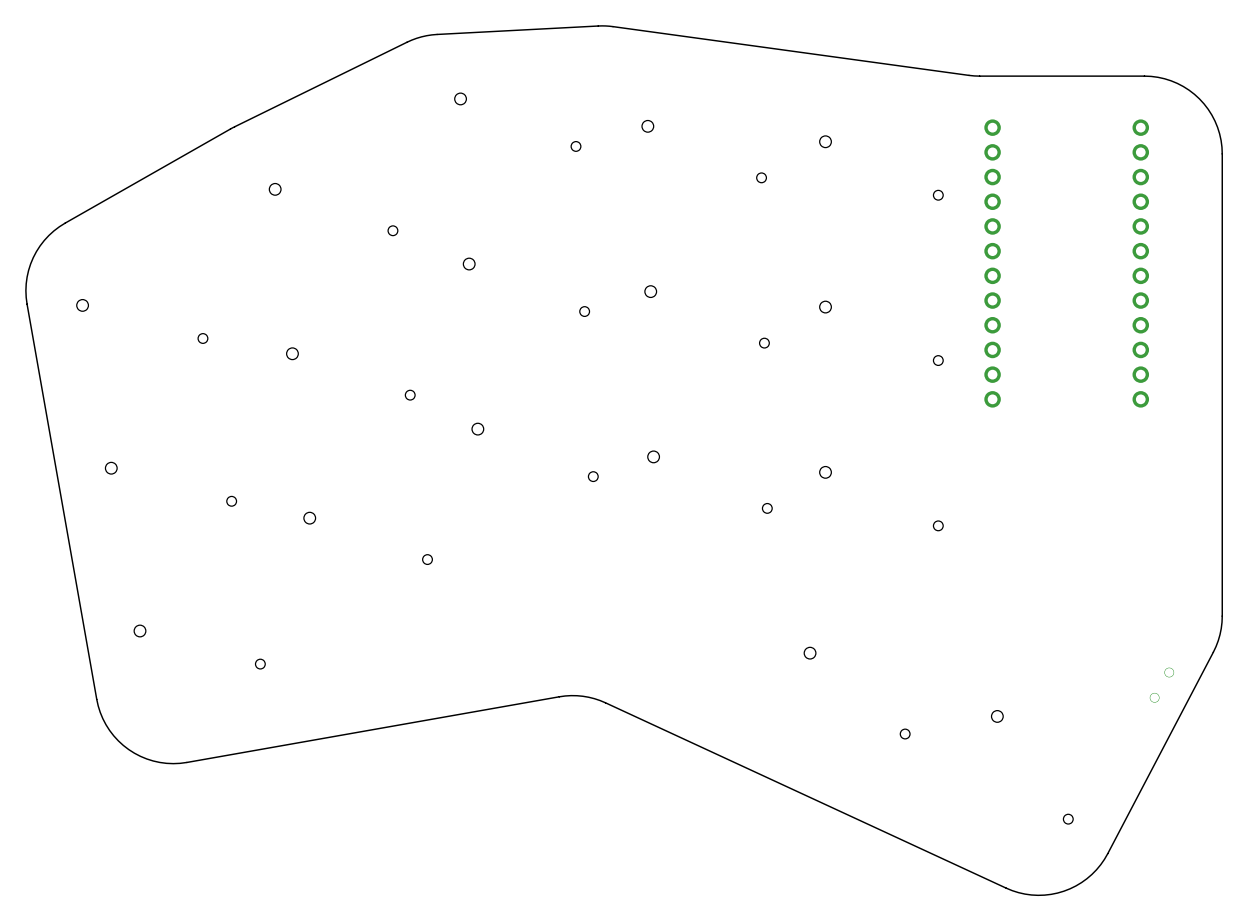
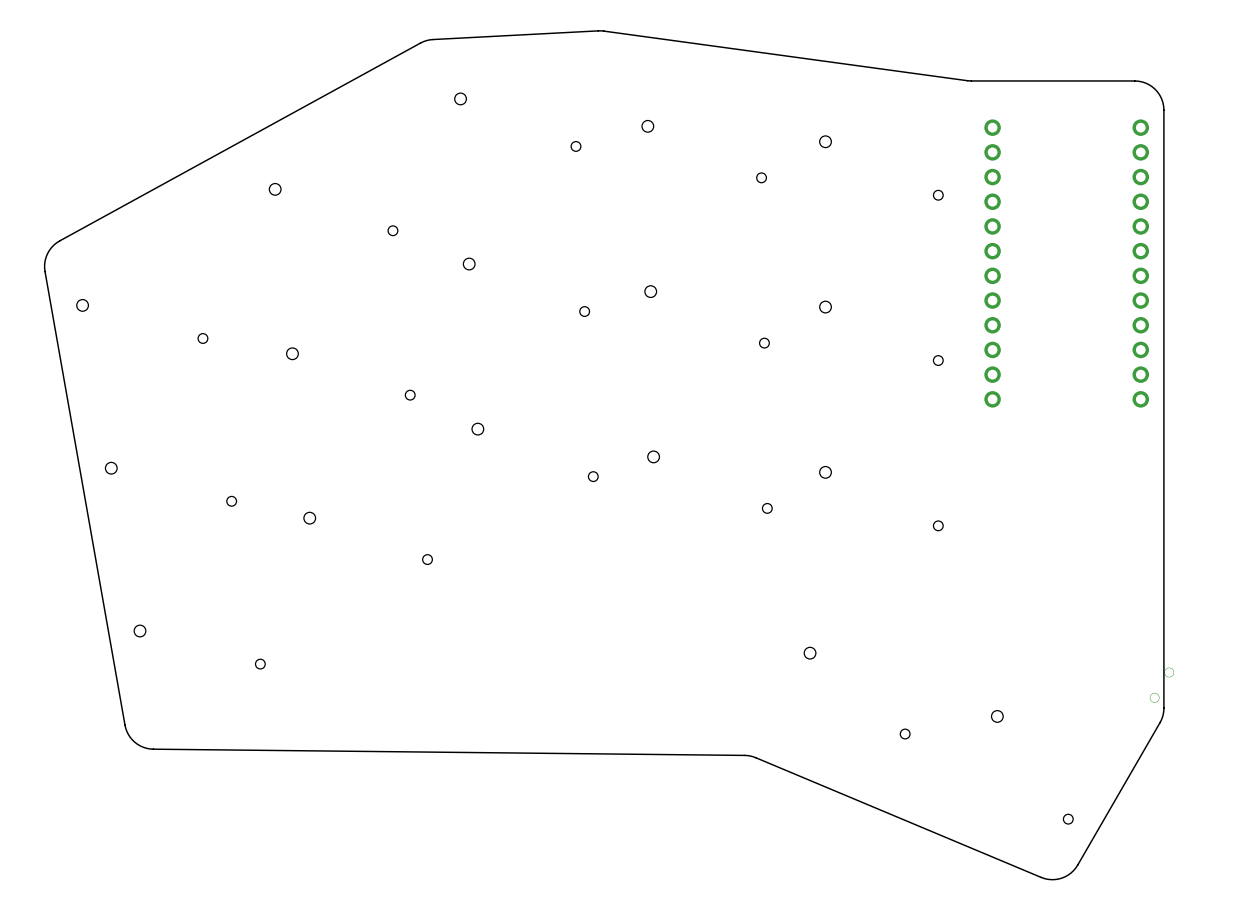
board edge: (598, 26) (437, 34) (411, 40) (230, 129) (65, 223) (54, 230) (40, 245) (28, 270) (26, 283) (27, 304) (96, 699) (105, 724) (118, 740) (134, 753) (159, 762) (180, 763) (559, 696) (582, 696) (605, 702) (1012, 890) (1024, 894) (1044, 895) (1063, 891) (1075, 885) (1091, 874) (1107, 853) (1213, 652) (1221, 628) (1222, 153) (1219, 133) (1211, 115) (1204, 103) (1189, 90) (1171, 80) (1157, 77) (974, 75) (598, 26) -> (598, 30) (969, 80) (1138, 81) (1149, 84) (1160, 95) (1163, 110) (1163, 710) (1160, 722) (1077, 865) (1068, 875) (1054, 879) (1041, 877) (747, 755) (153, 749) (140, 745) (128, 734) (124, 725) (45, 271) (45, 260) (49, 250) (59, 240) (423, 41) (432, 39) (598, 30)

